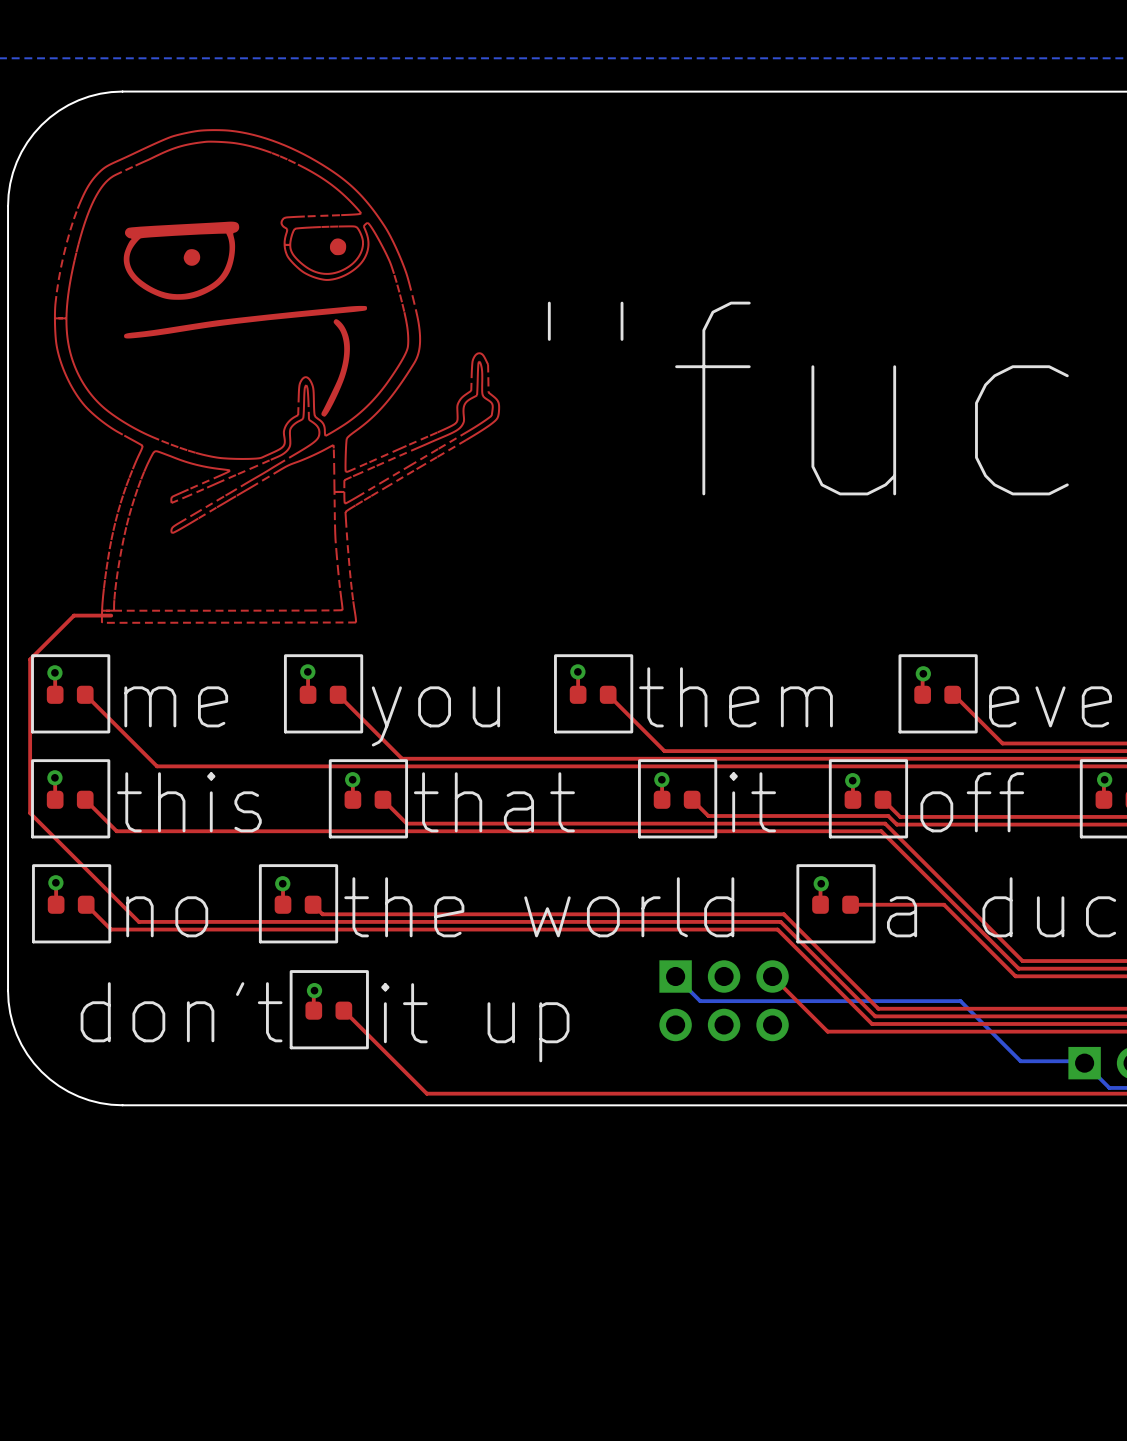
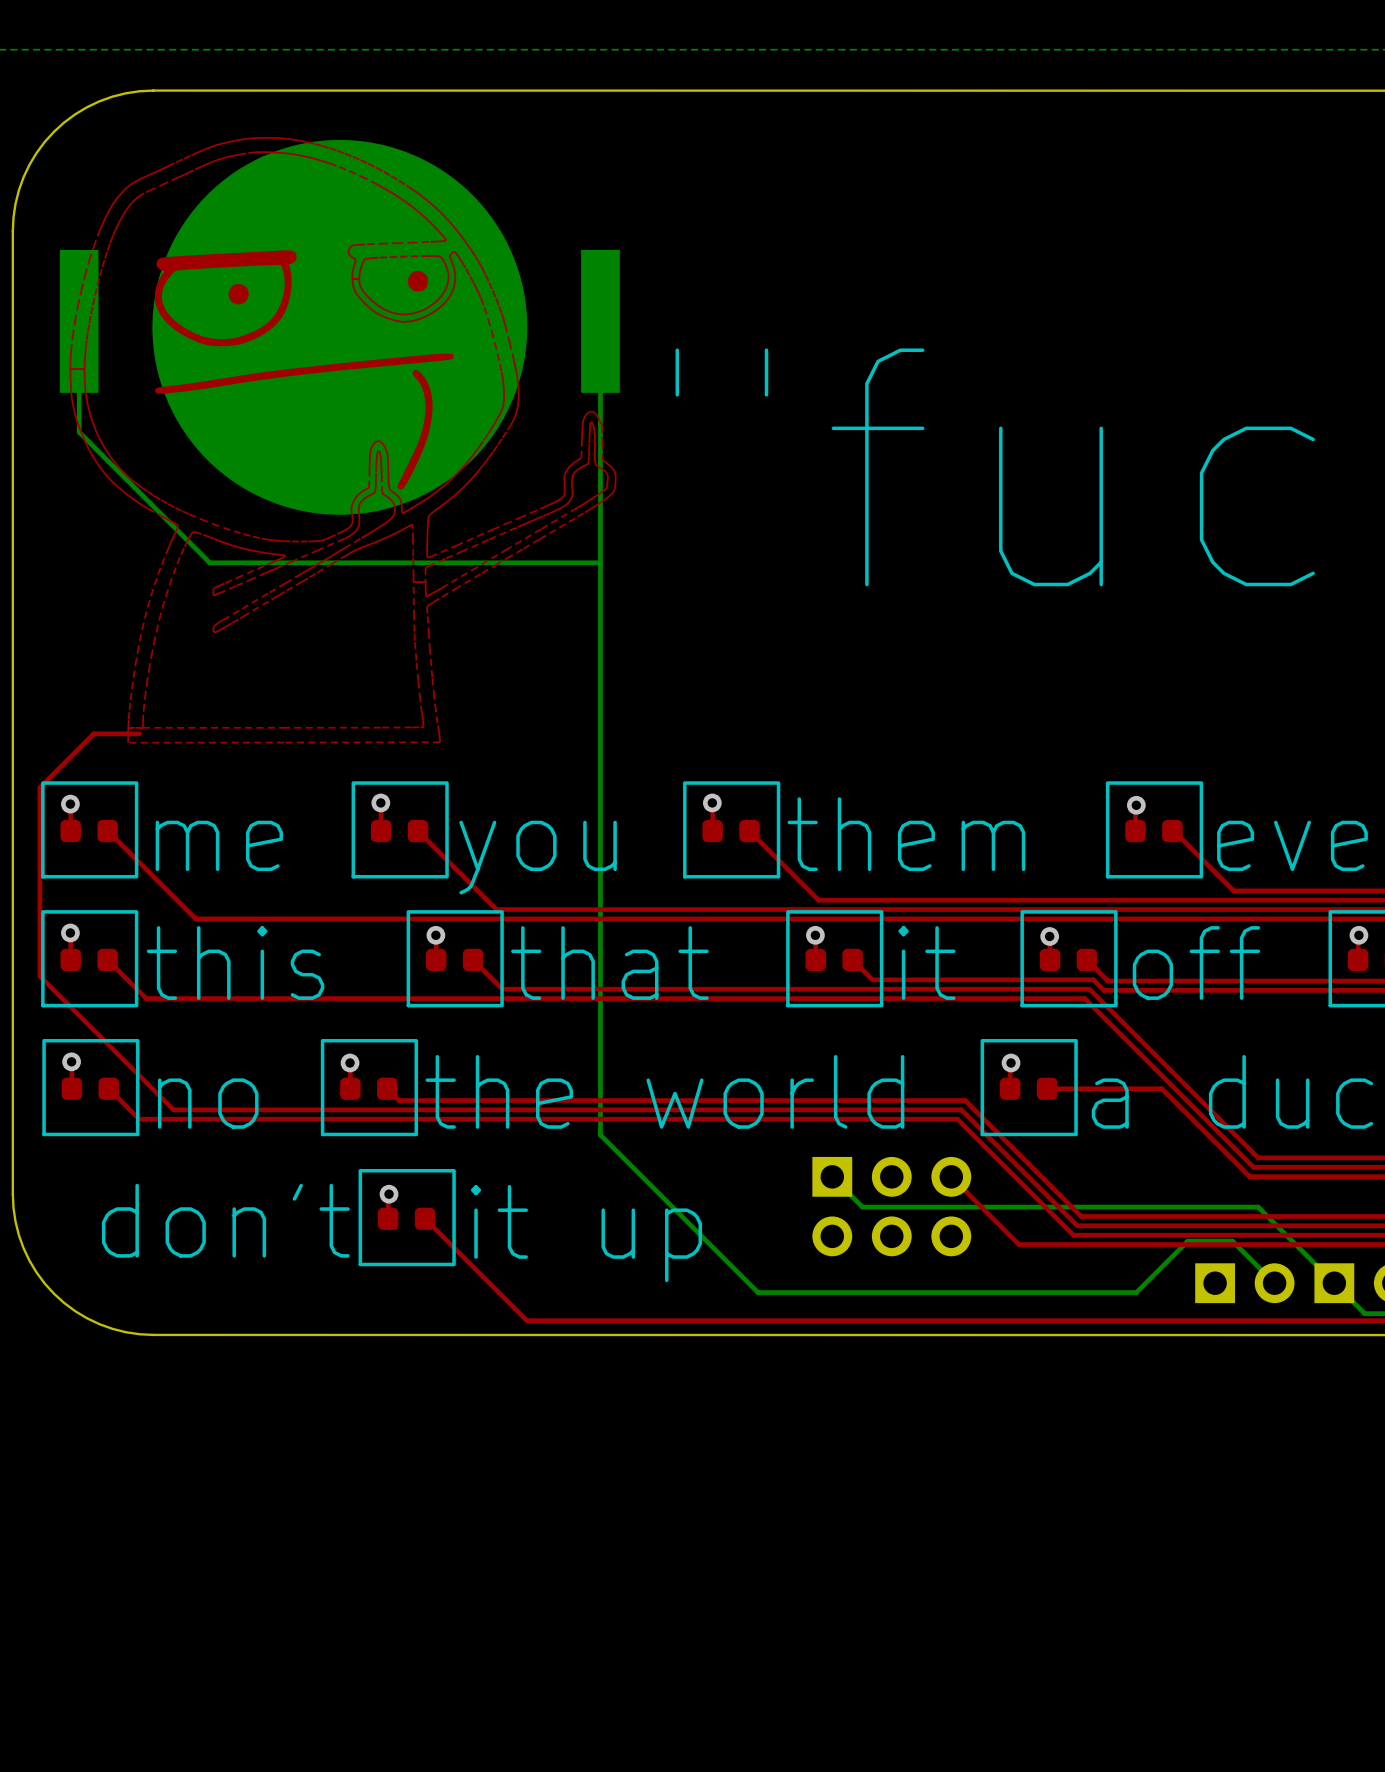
bottom track: none -> (79, 321) (79, 432) (209, 562) (600, 562)
bottom track: none -> (600, 321) (600, 1135) (758, 1292) (1136, 1292) (1187, 1241) (1232, 1241) (1274, 1283)
part: none -> (339, 327)
bottom track: (960, 1001) (1020, 1061) (1082, 1061) -> (1182, 1207) (1258, 1207) (1332, 1280)
part: none -> (1244, 1283)

